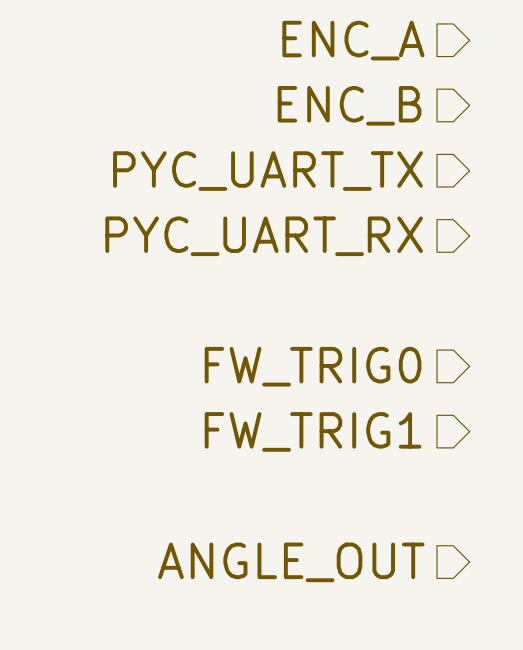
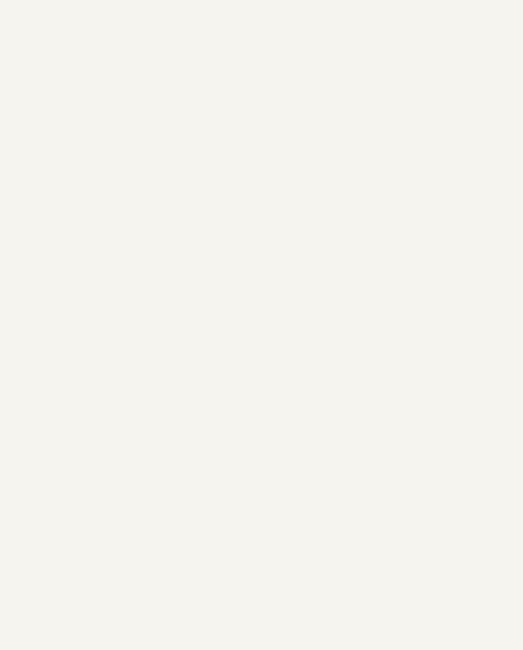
hierarchical label: ENC_A (353, 40) -> none
hierarchical label: ENC_B (349, 105) -> none
hierarchical label: PYC_UART_TX (268, 171) -> none
hierarchical label: PYC_UART_RX (264, 236) -> none
hierarchical label: FW_TRIG0 (313, 366) -> none
hierarchical label: FW_TRIG1 (313, 431) -> none
hierarchical label: ANGLE_OUT (291, 562) -> none

